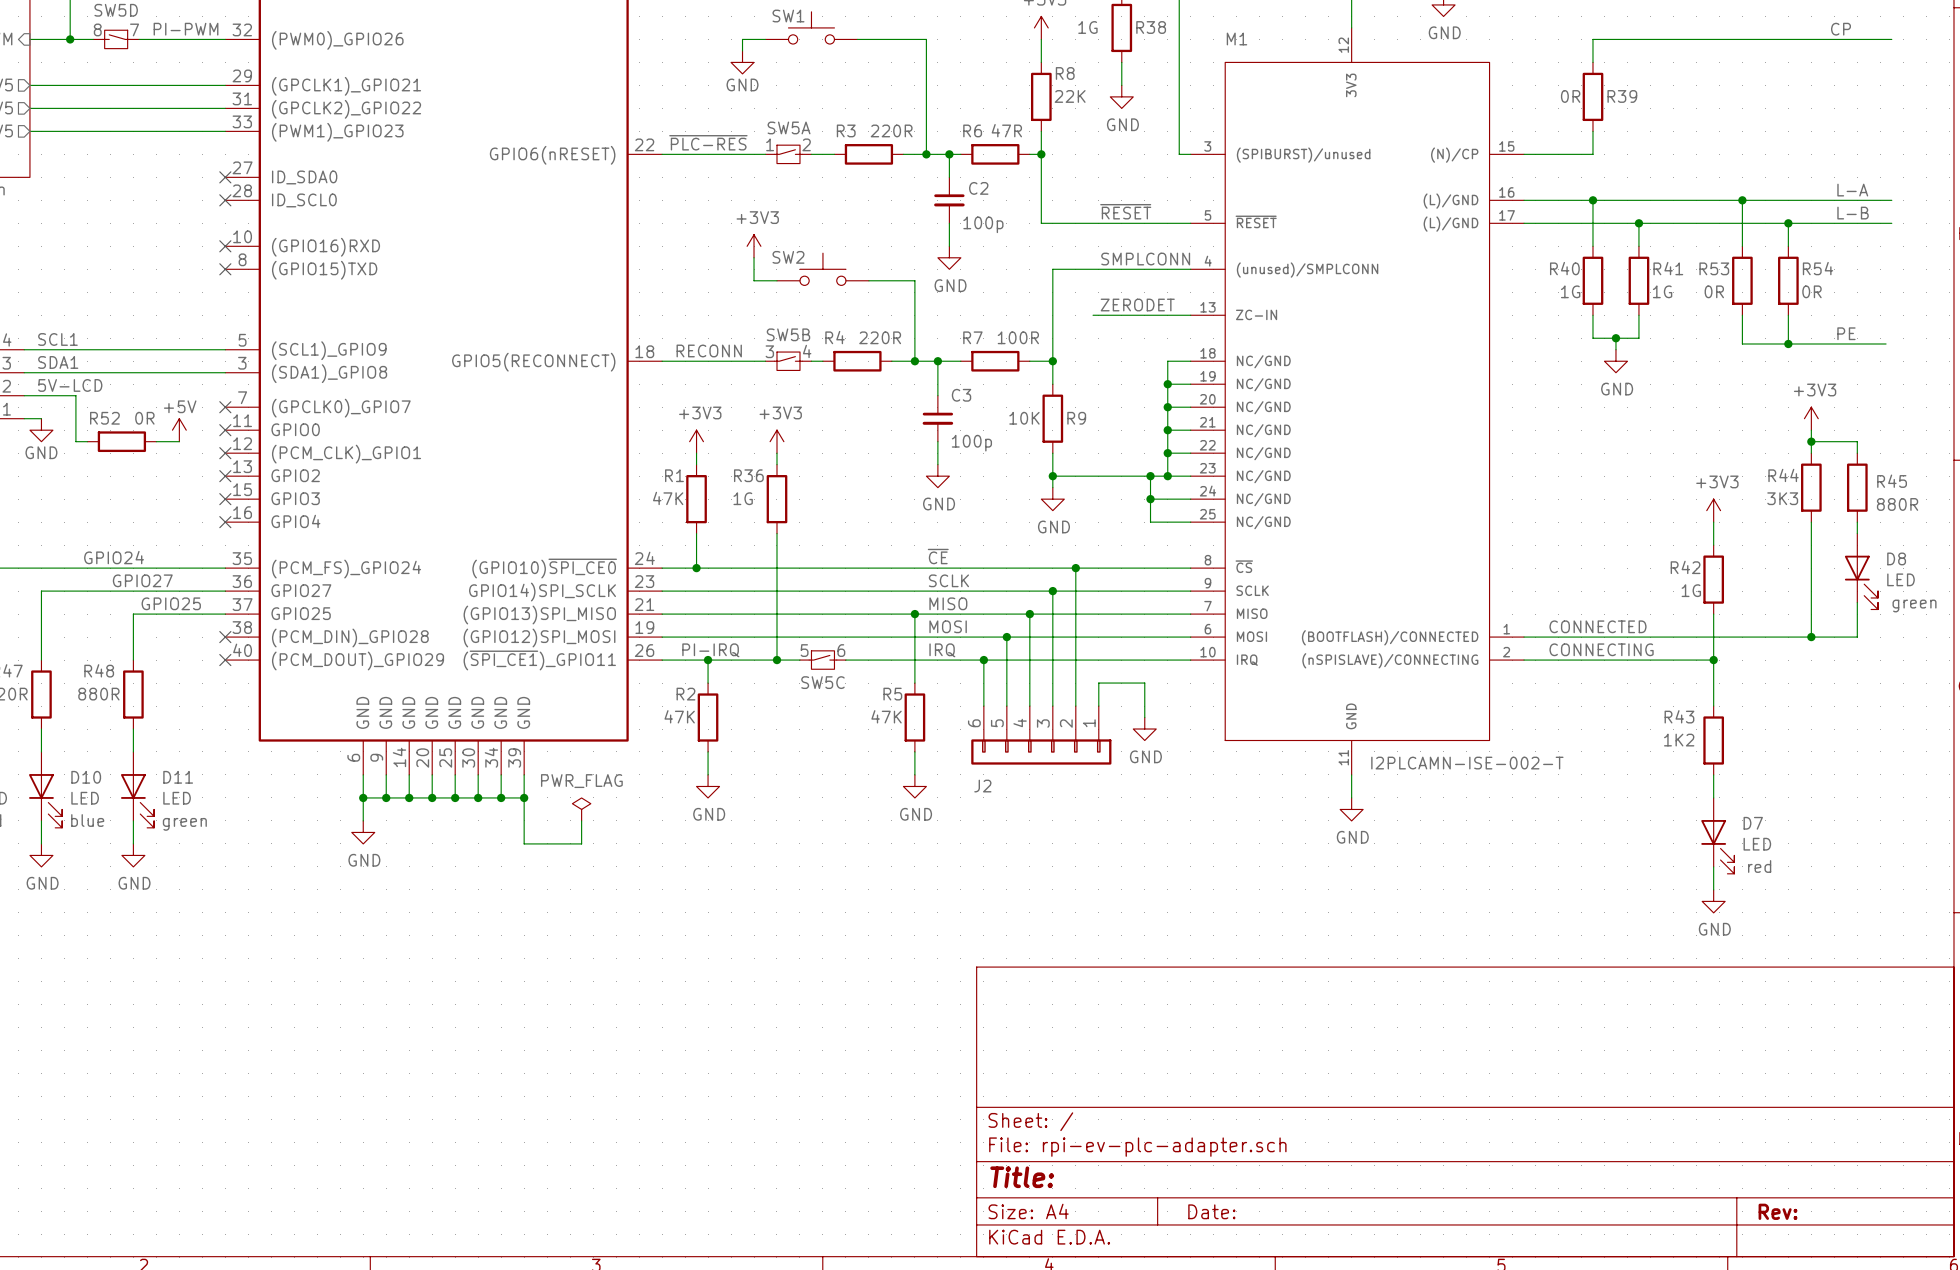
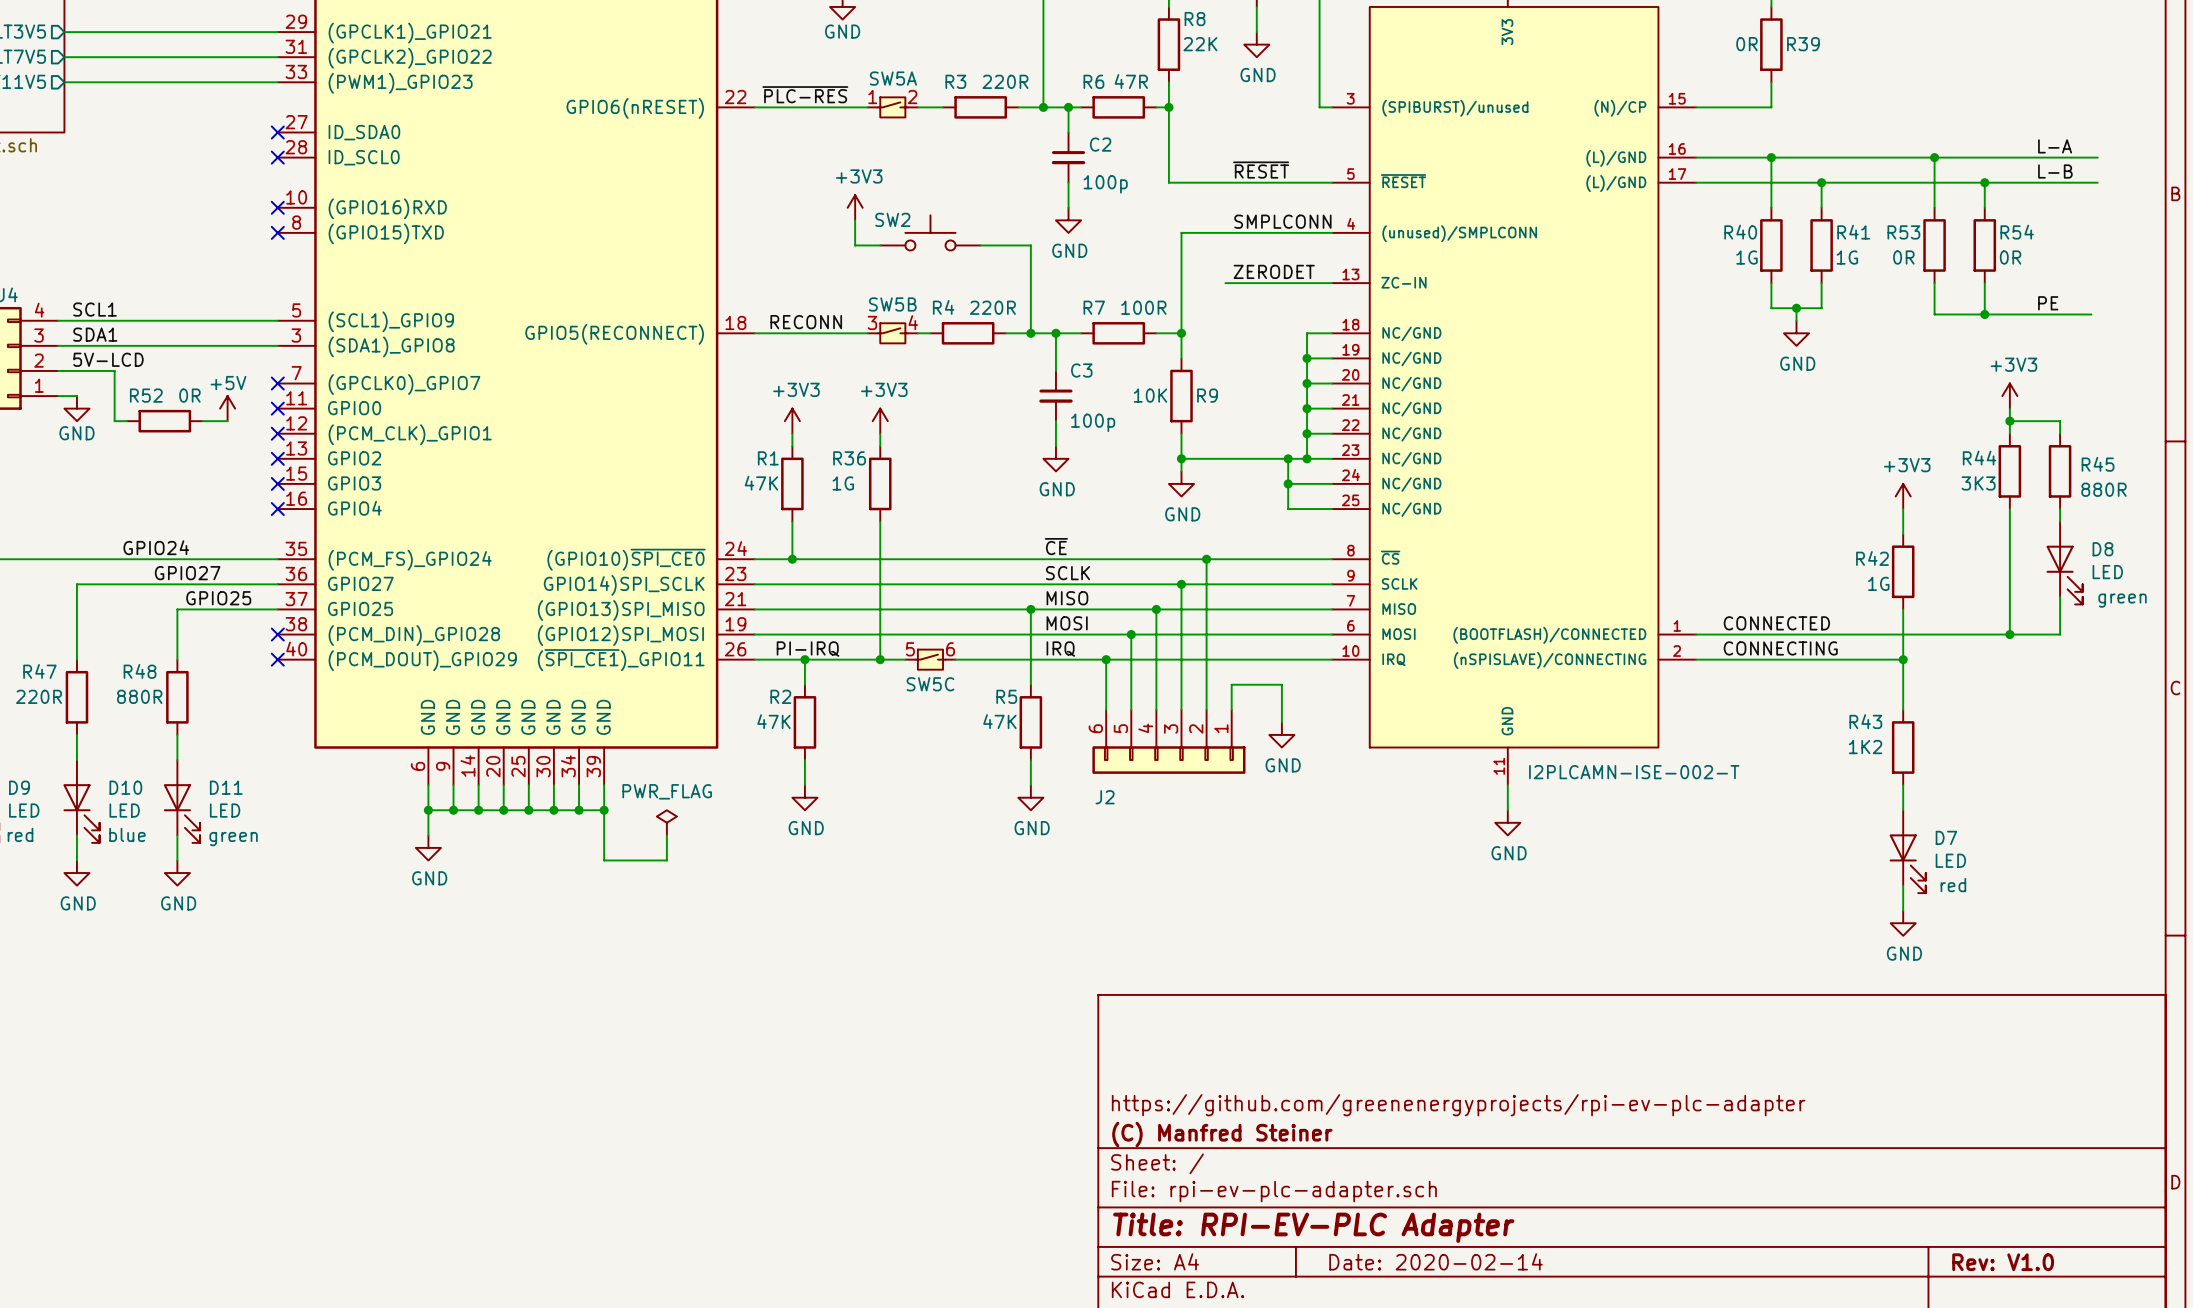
title block: none -> https://github.com/greenenergyprojects/rpi-ev-plc-adapter (1458, 1105)
title block: none -> (C) Manfred Steiner (1222, 1134)
title block: Title: (1022, 1177) -> Title: RPI-EV-PLC Adapter (1313, 1227)
title block: Date: (1211, 1211) -> Date: 2020-02-14 (1436, 1261)
title block: Rev: (1778, 1211) -> Rev: V1.0 (2003, 1262)

